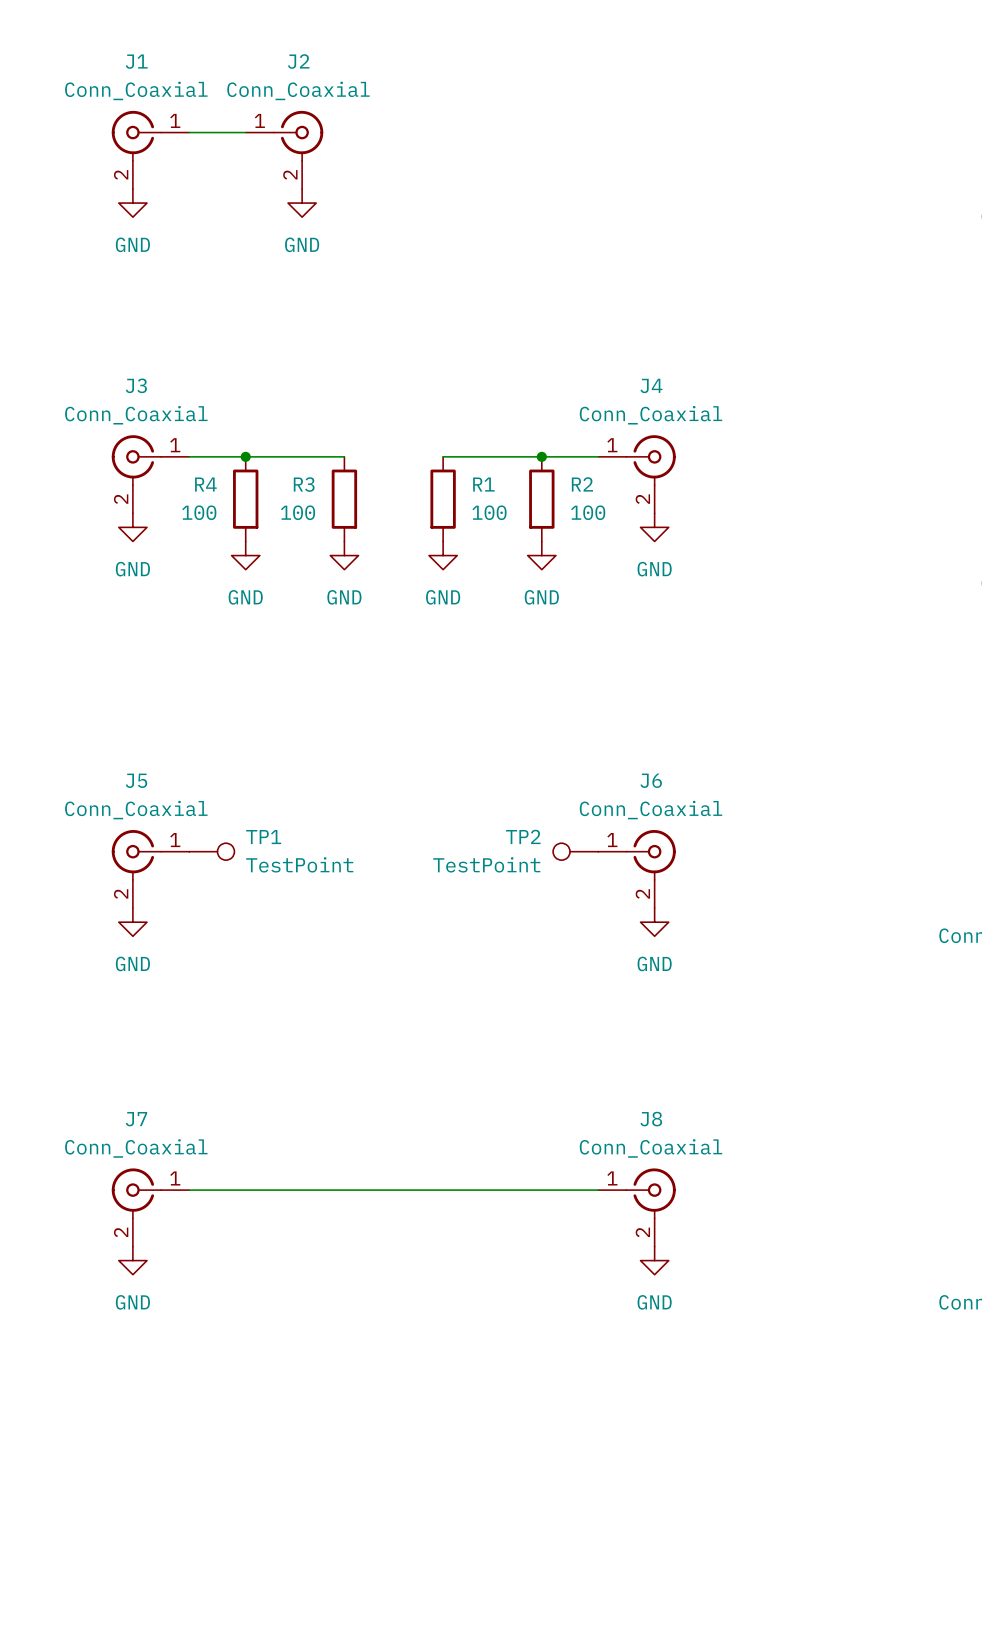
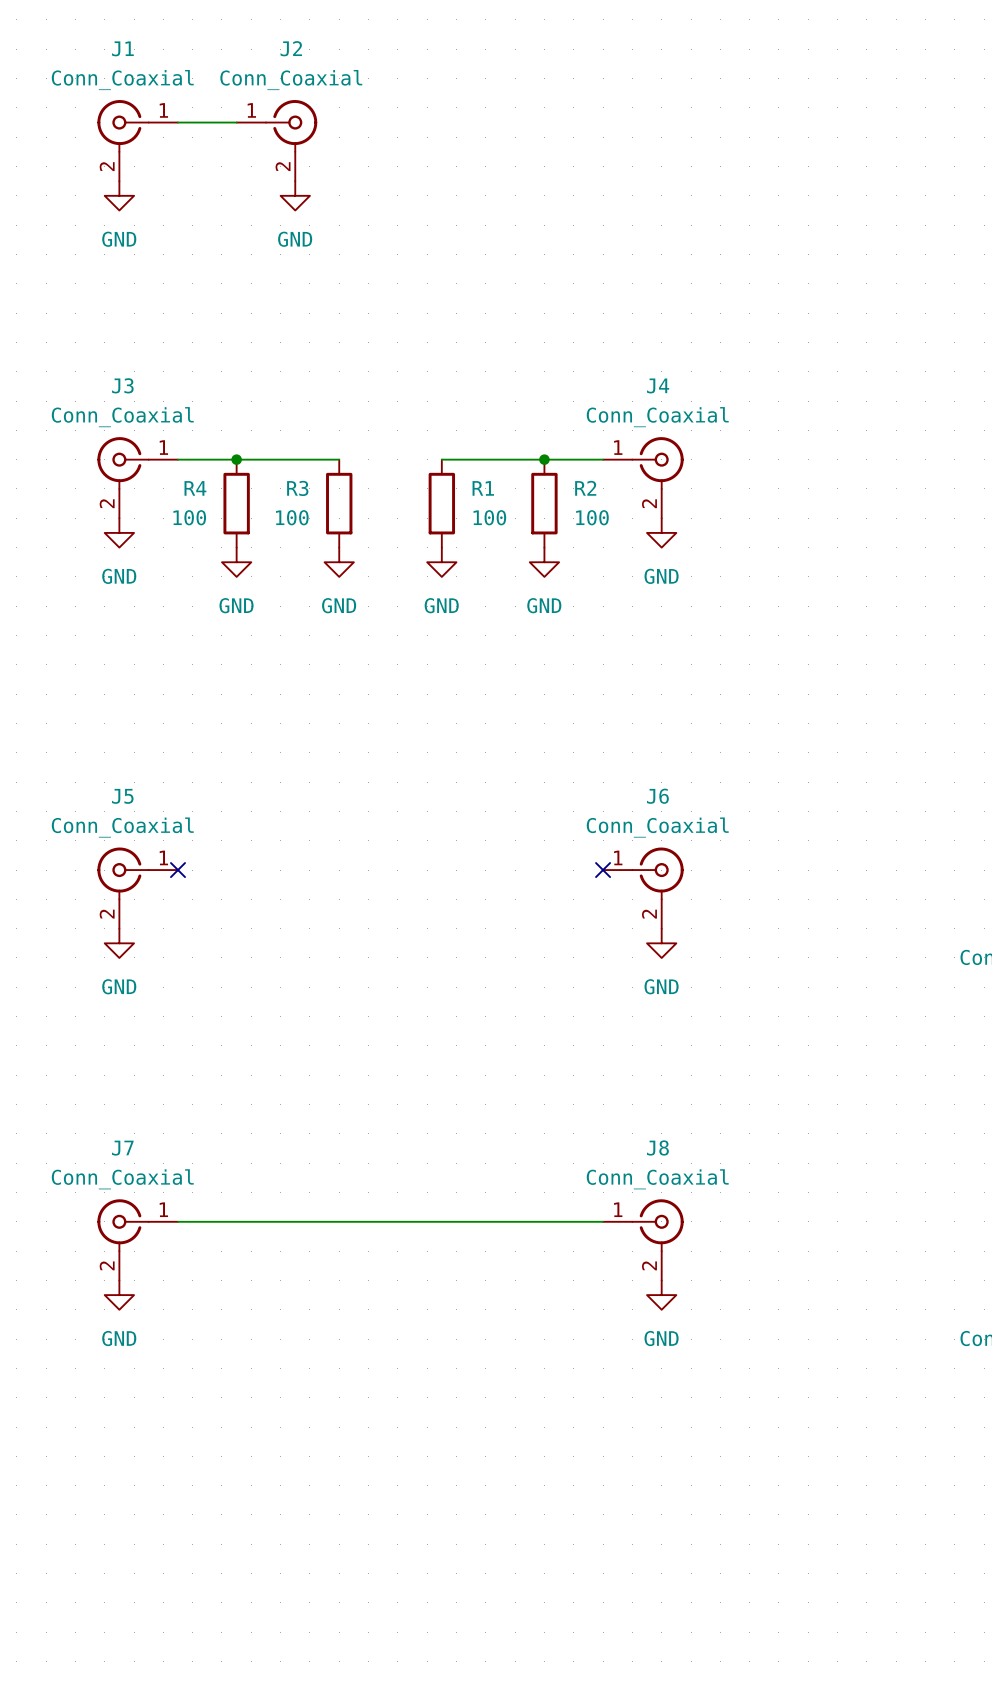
no-connect mark: none -> (178, 870)
TP1: TestPoint (211, 851) -> none
TP2: TestPoint (575, 851) -> none
no-connect mark: none -> (603, 870)

